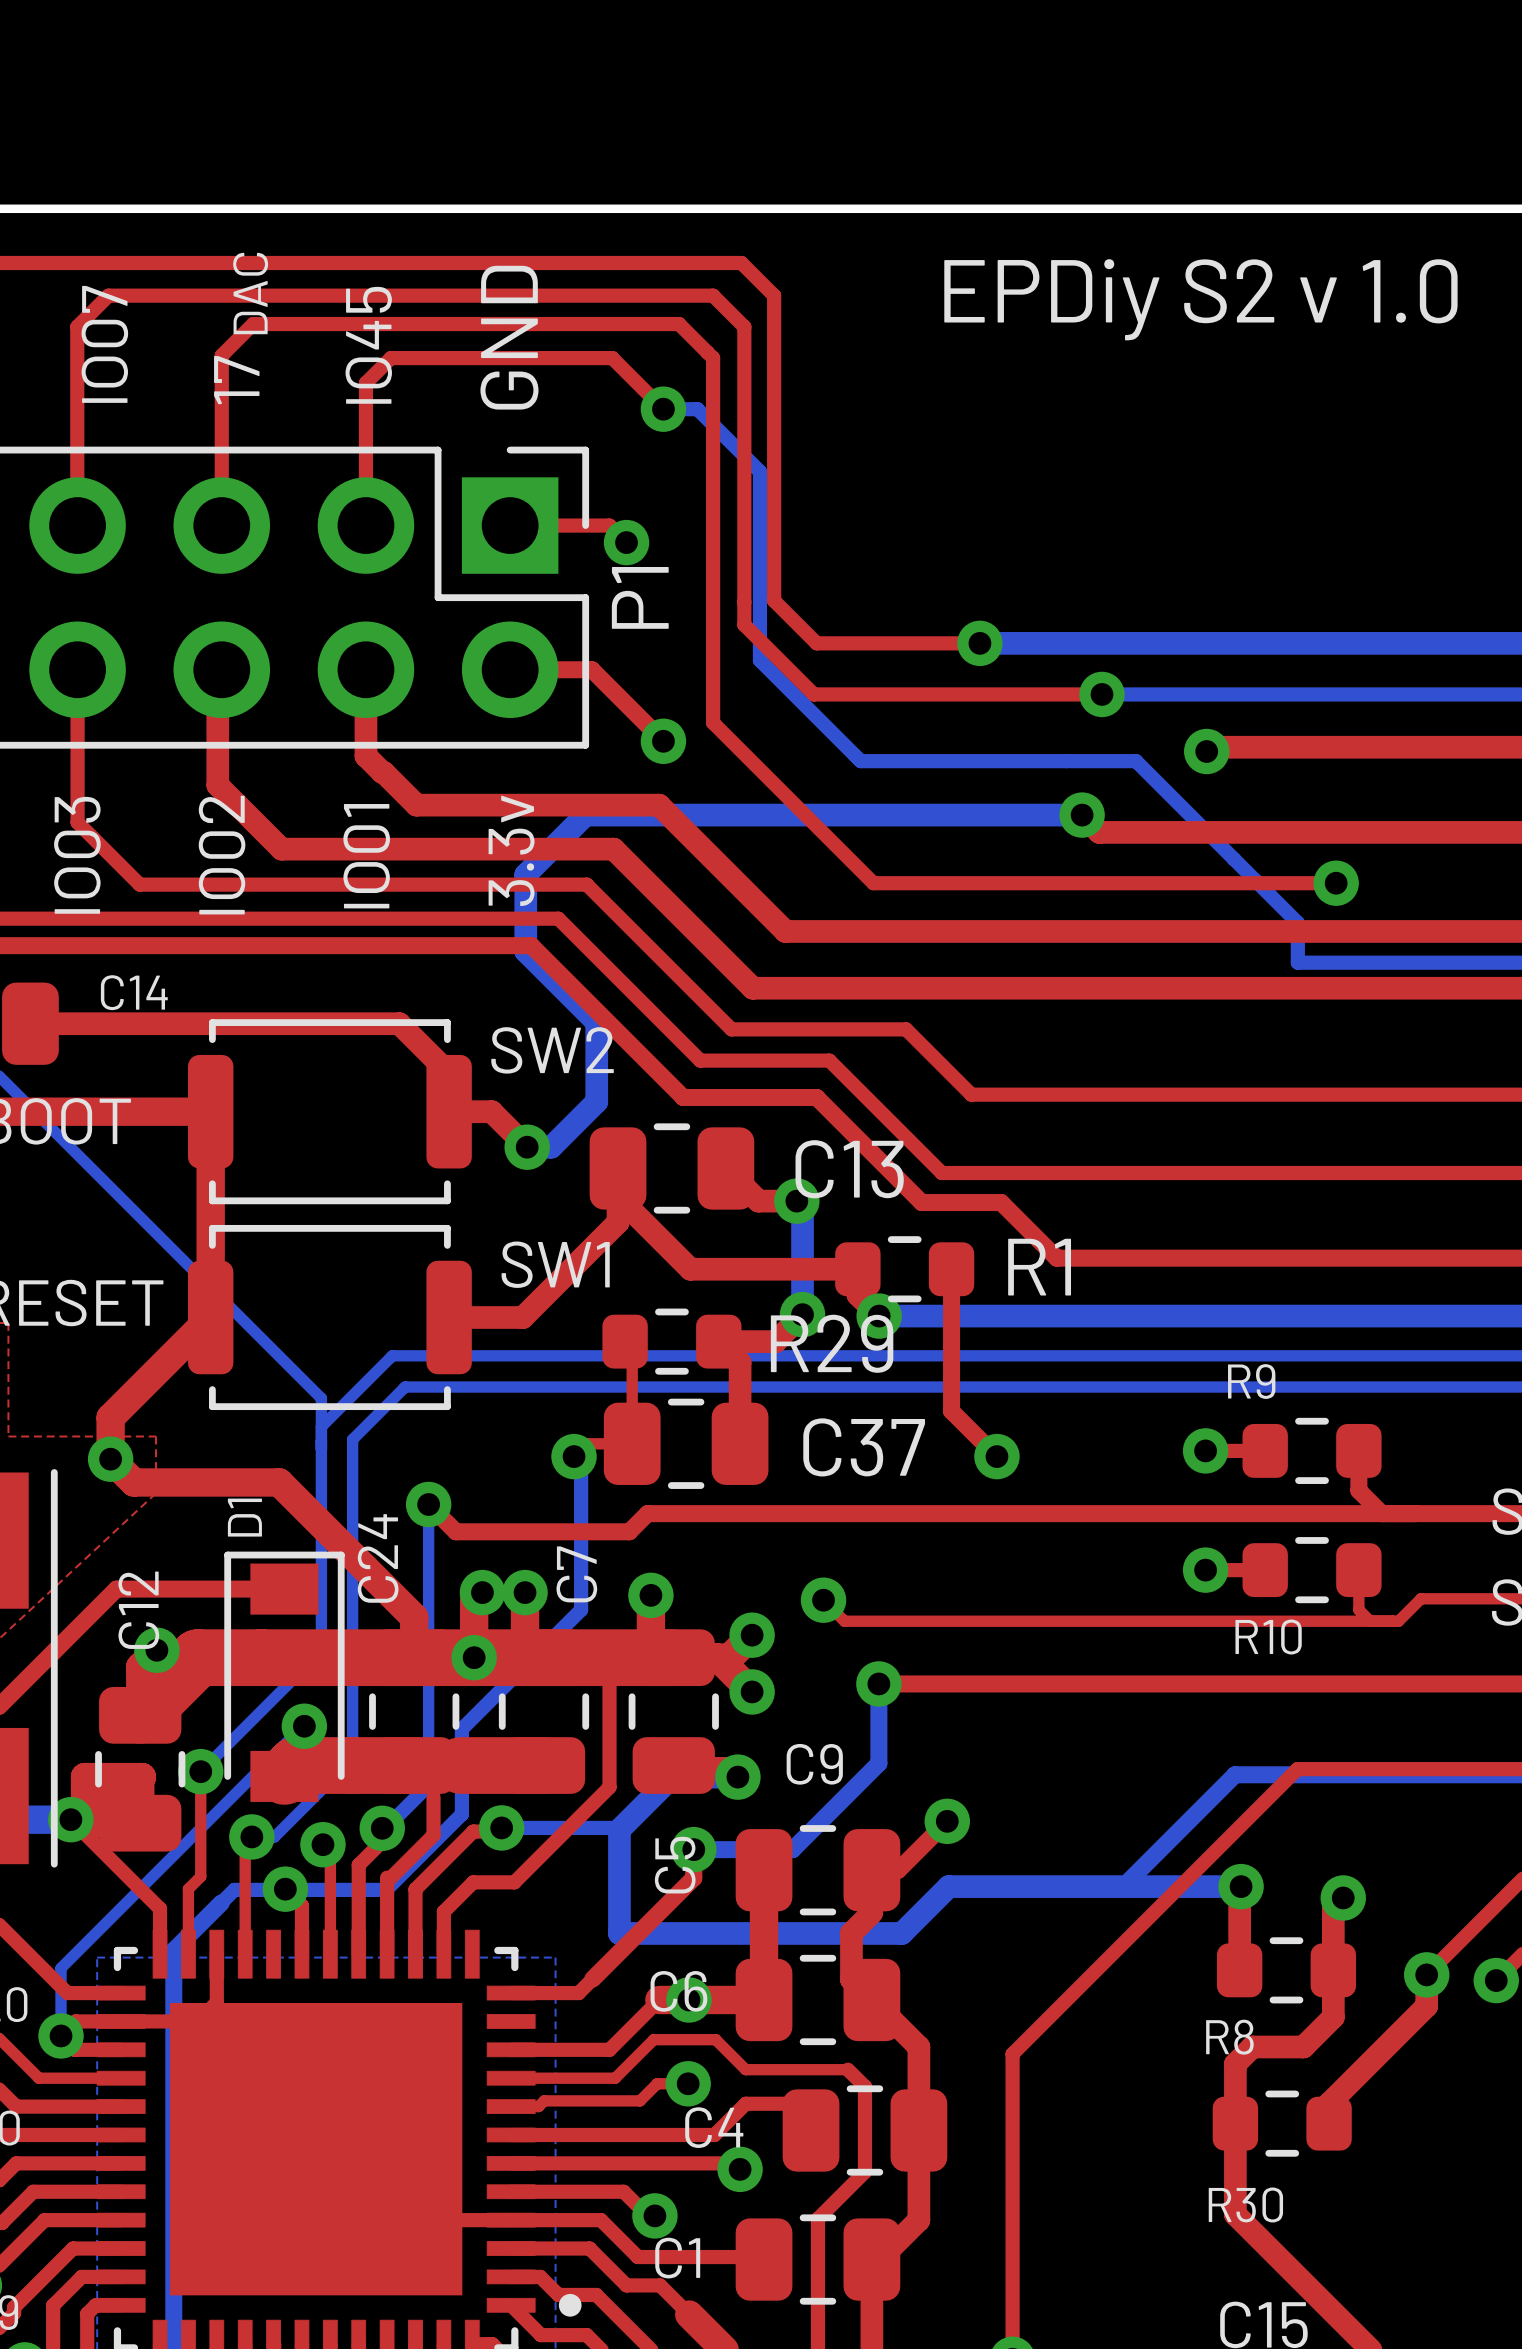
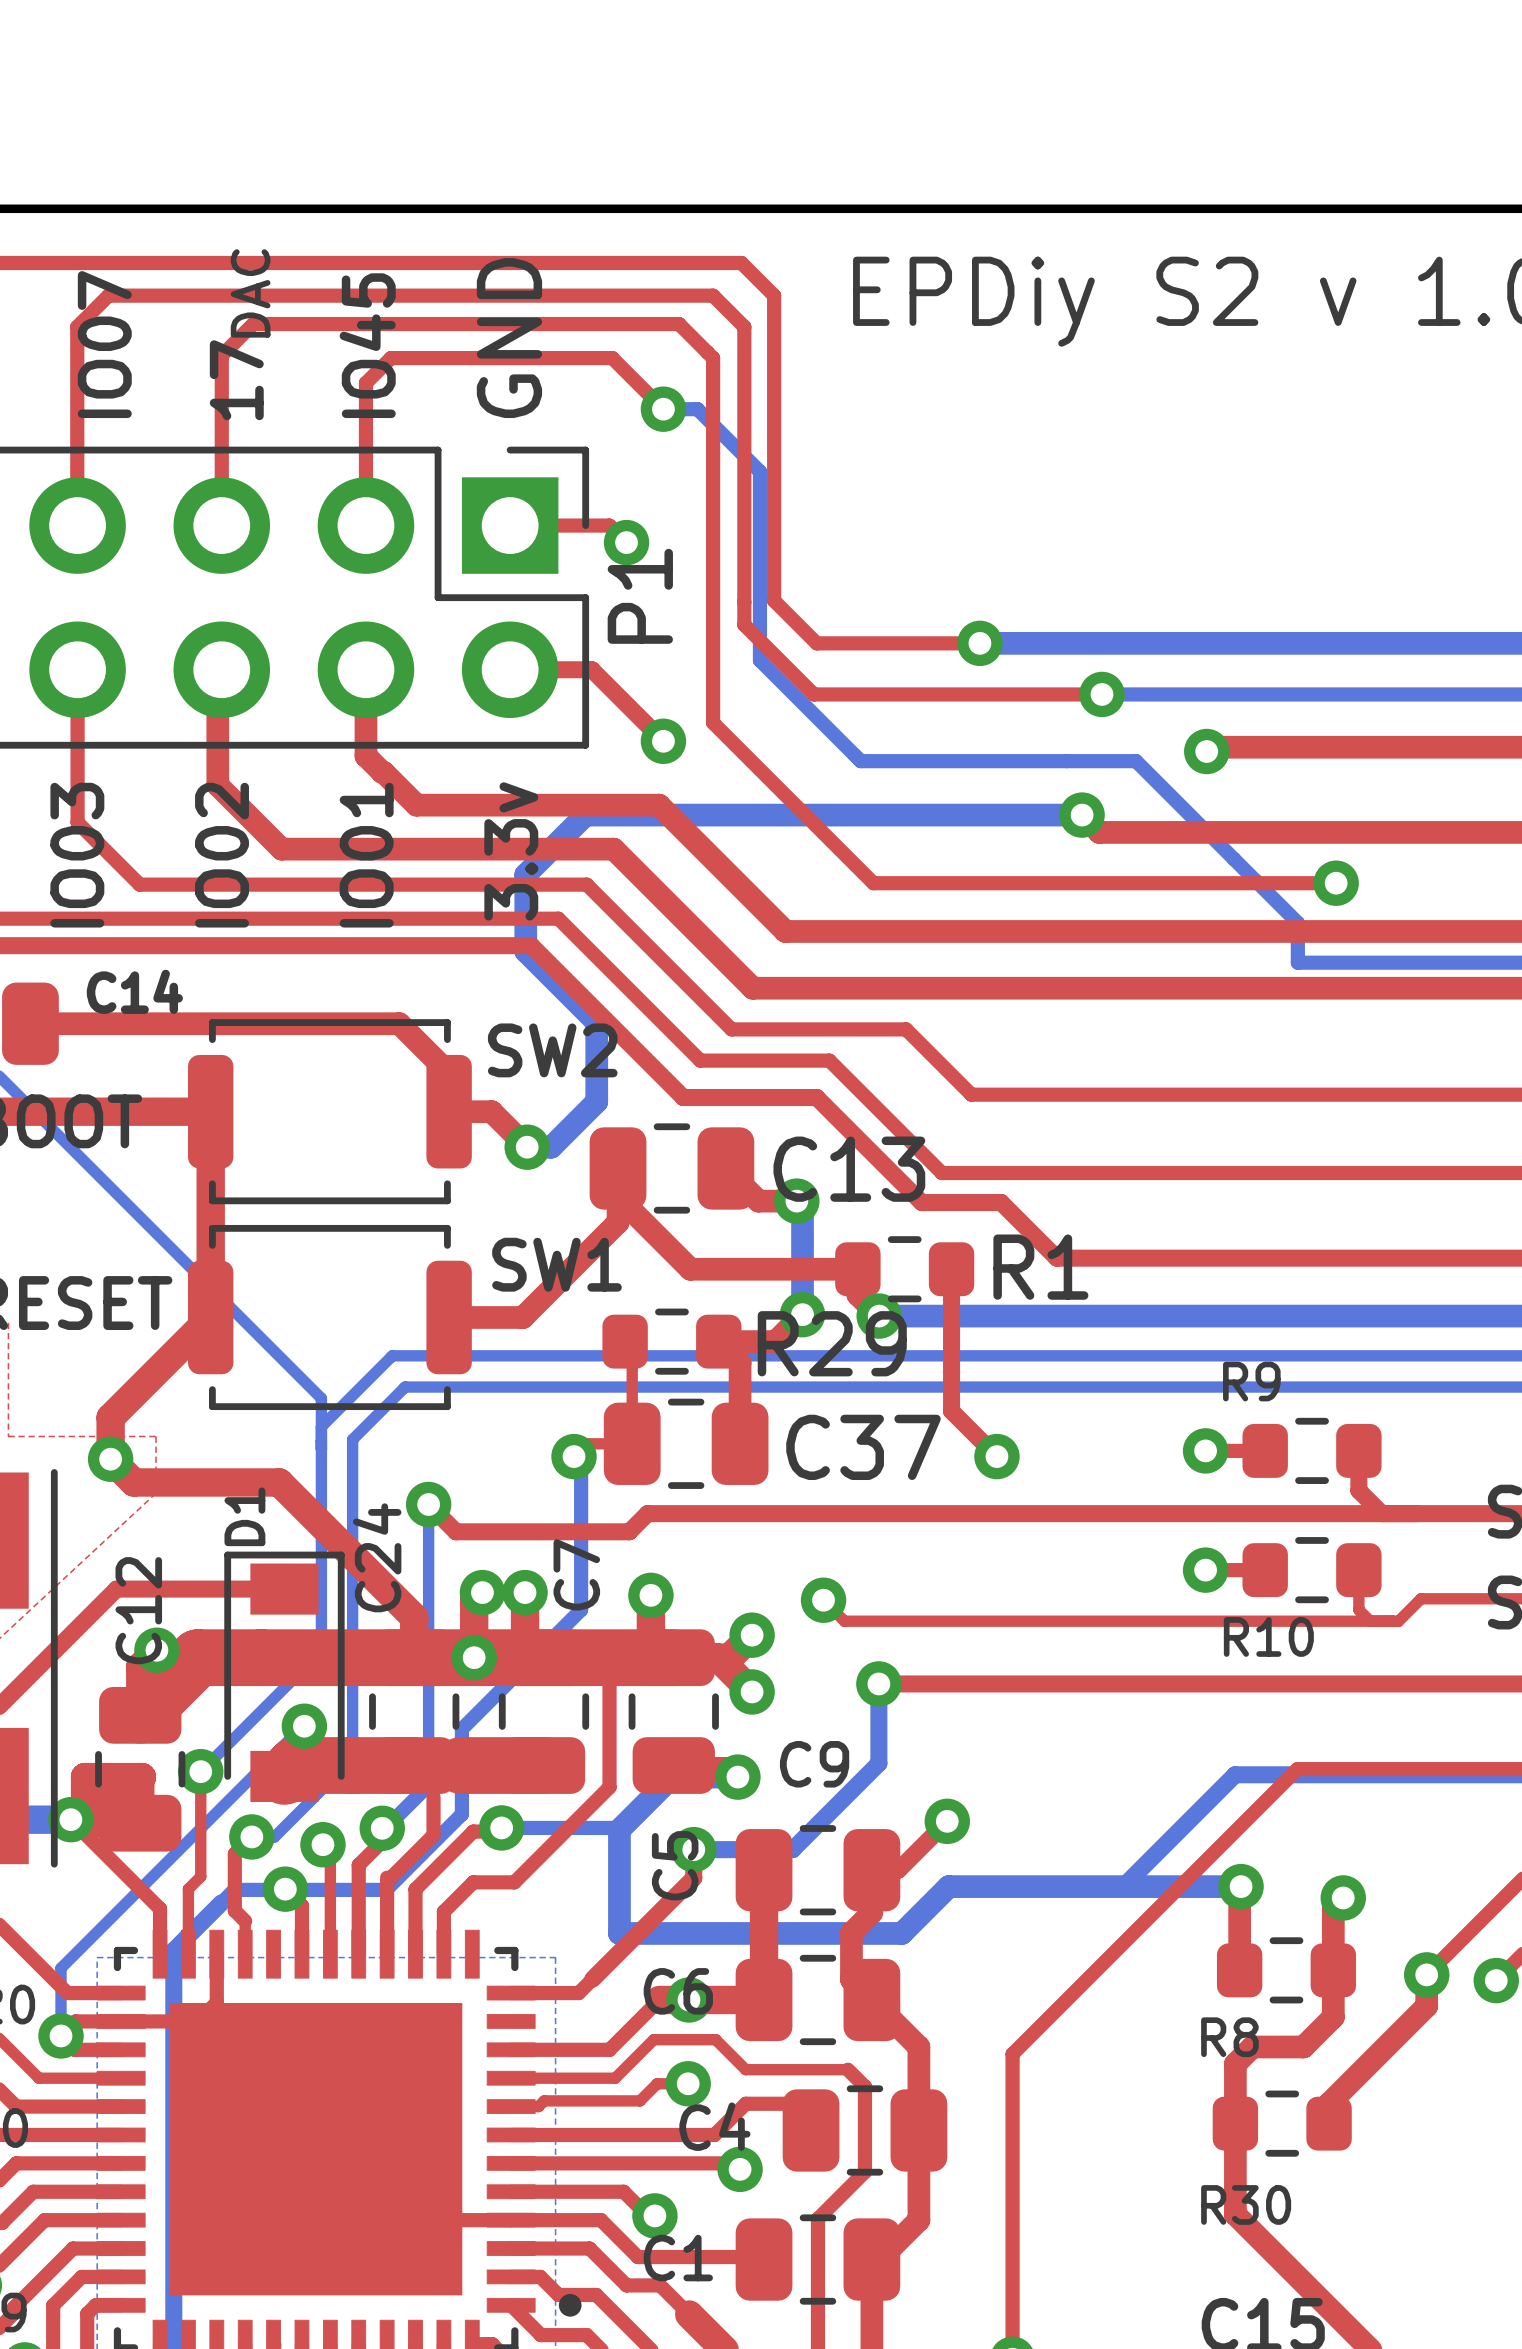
top track: (245, 1849) (245, 1921) -> (251, 1836) (234, 1853) (234, 1910) (245, 1921)

